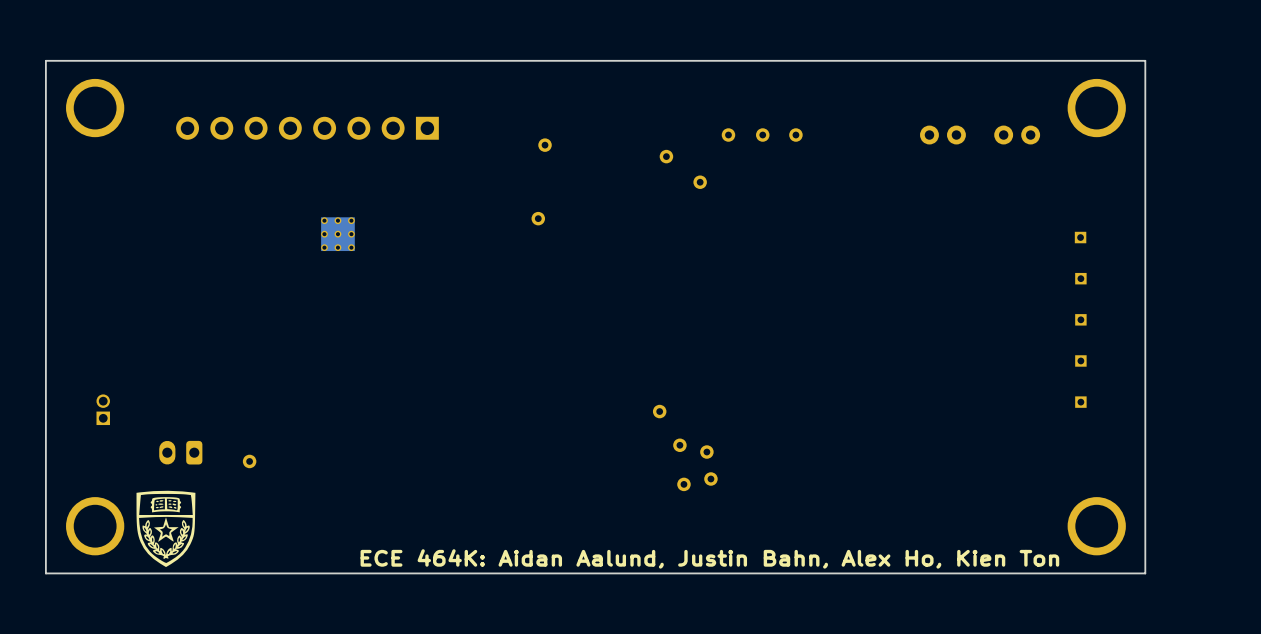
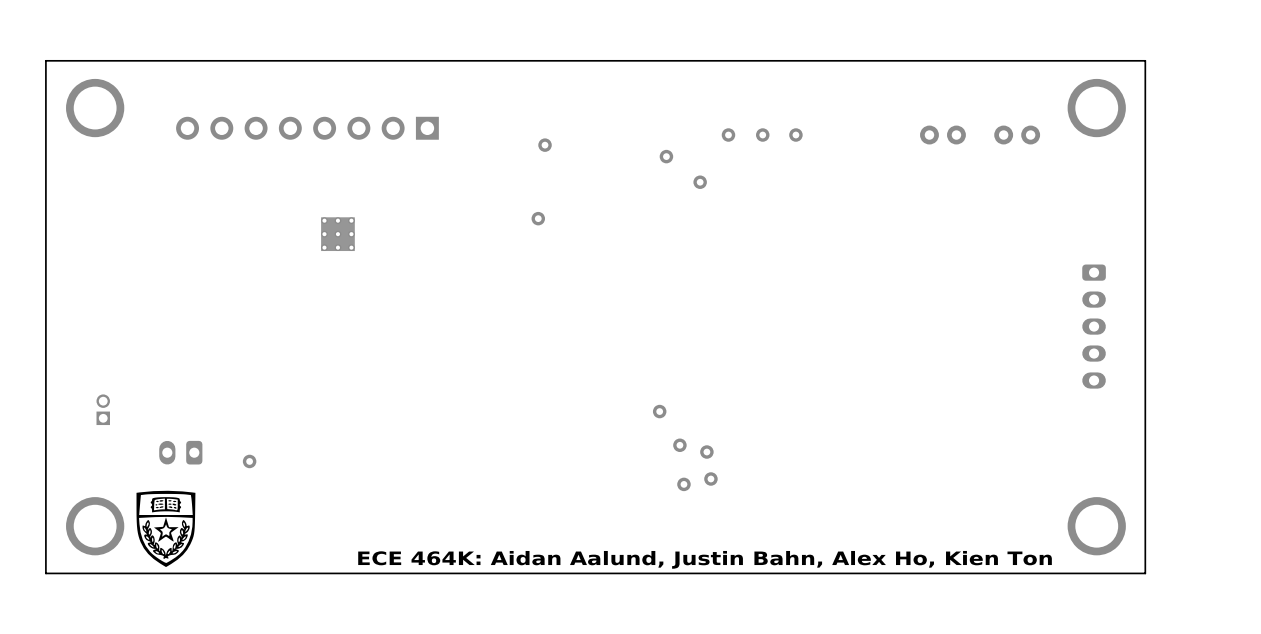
part: (1080, 237) -> none
part: (1080, 278) -> none
part: (1080, 319) -> none
part: none -> (1094, 326)
part: (1080, 360) -> none
part: (1080, 402) -> none

